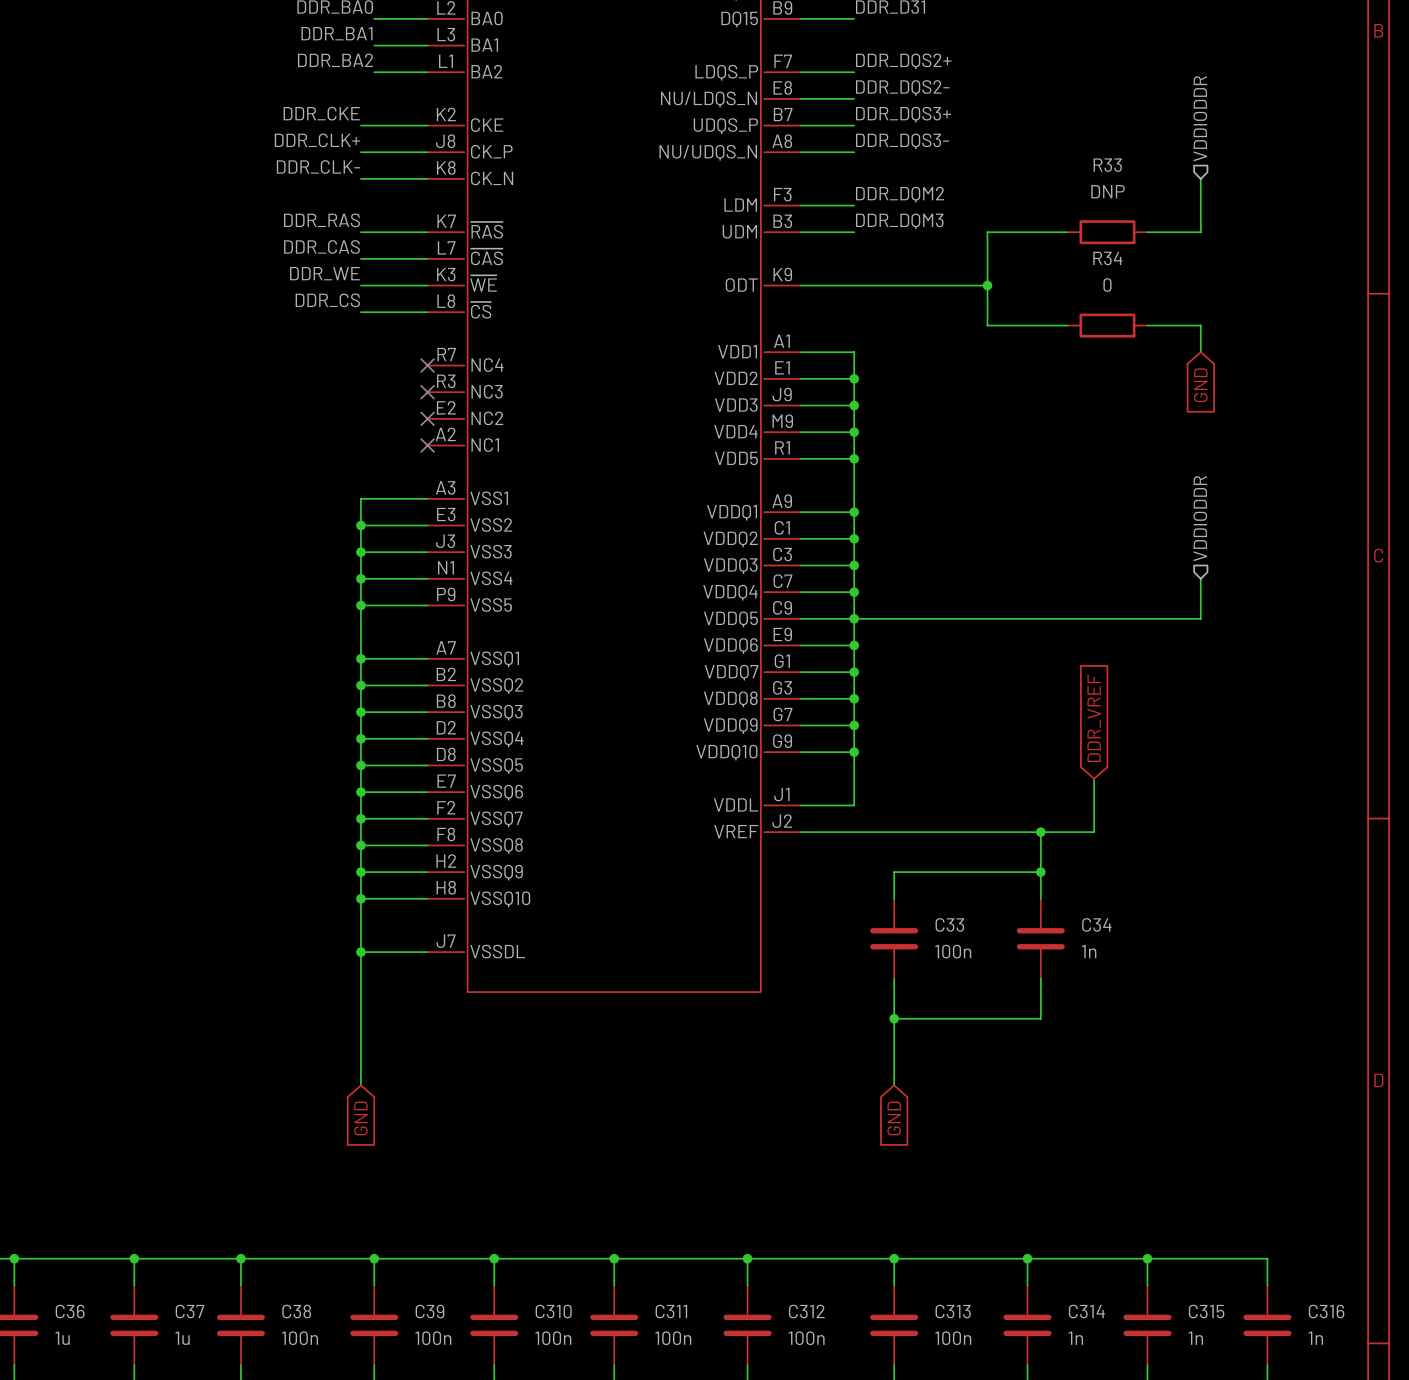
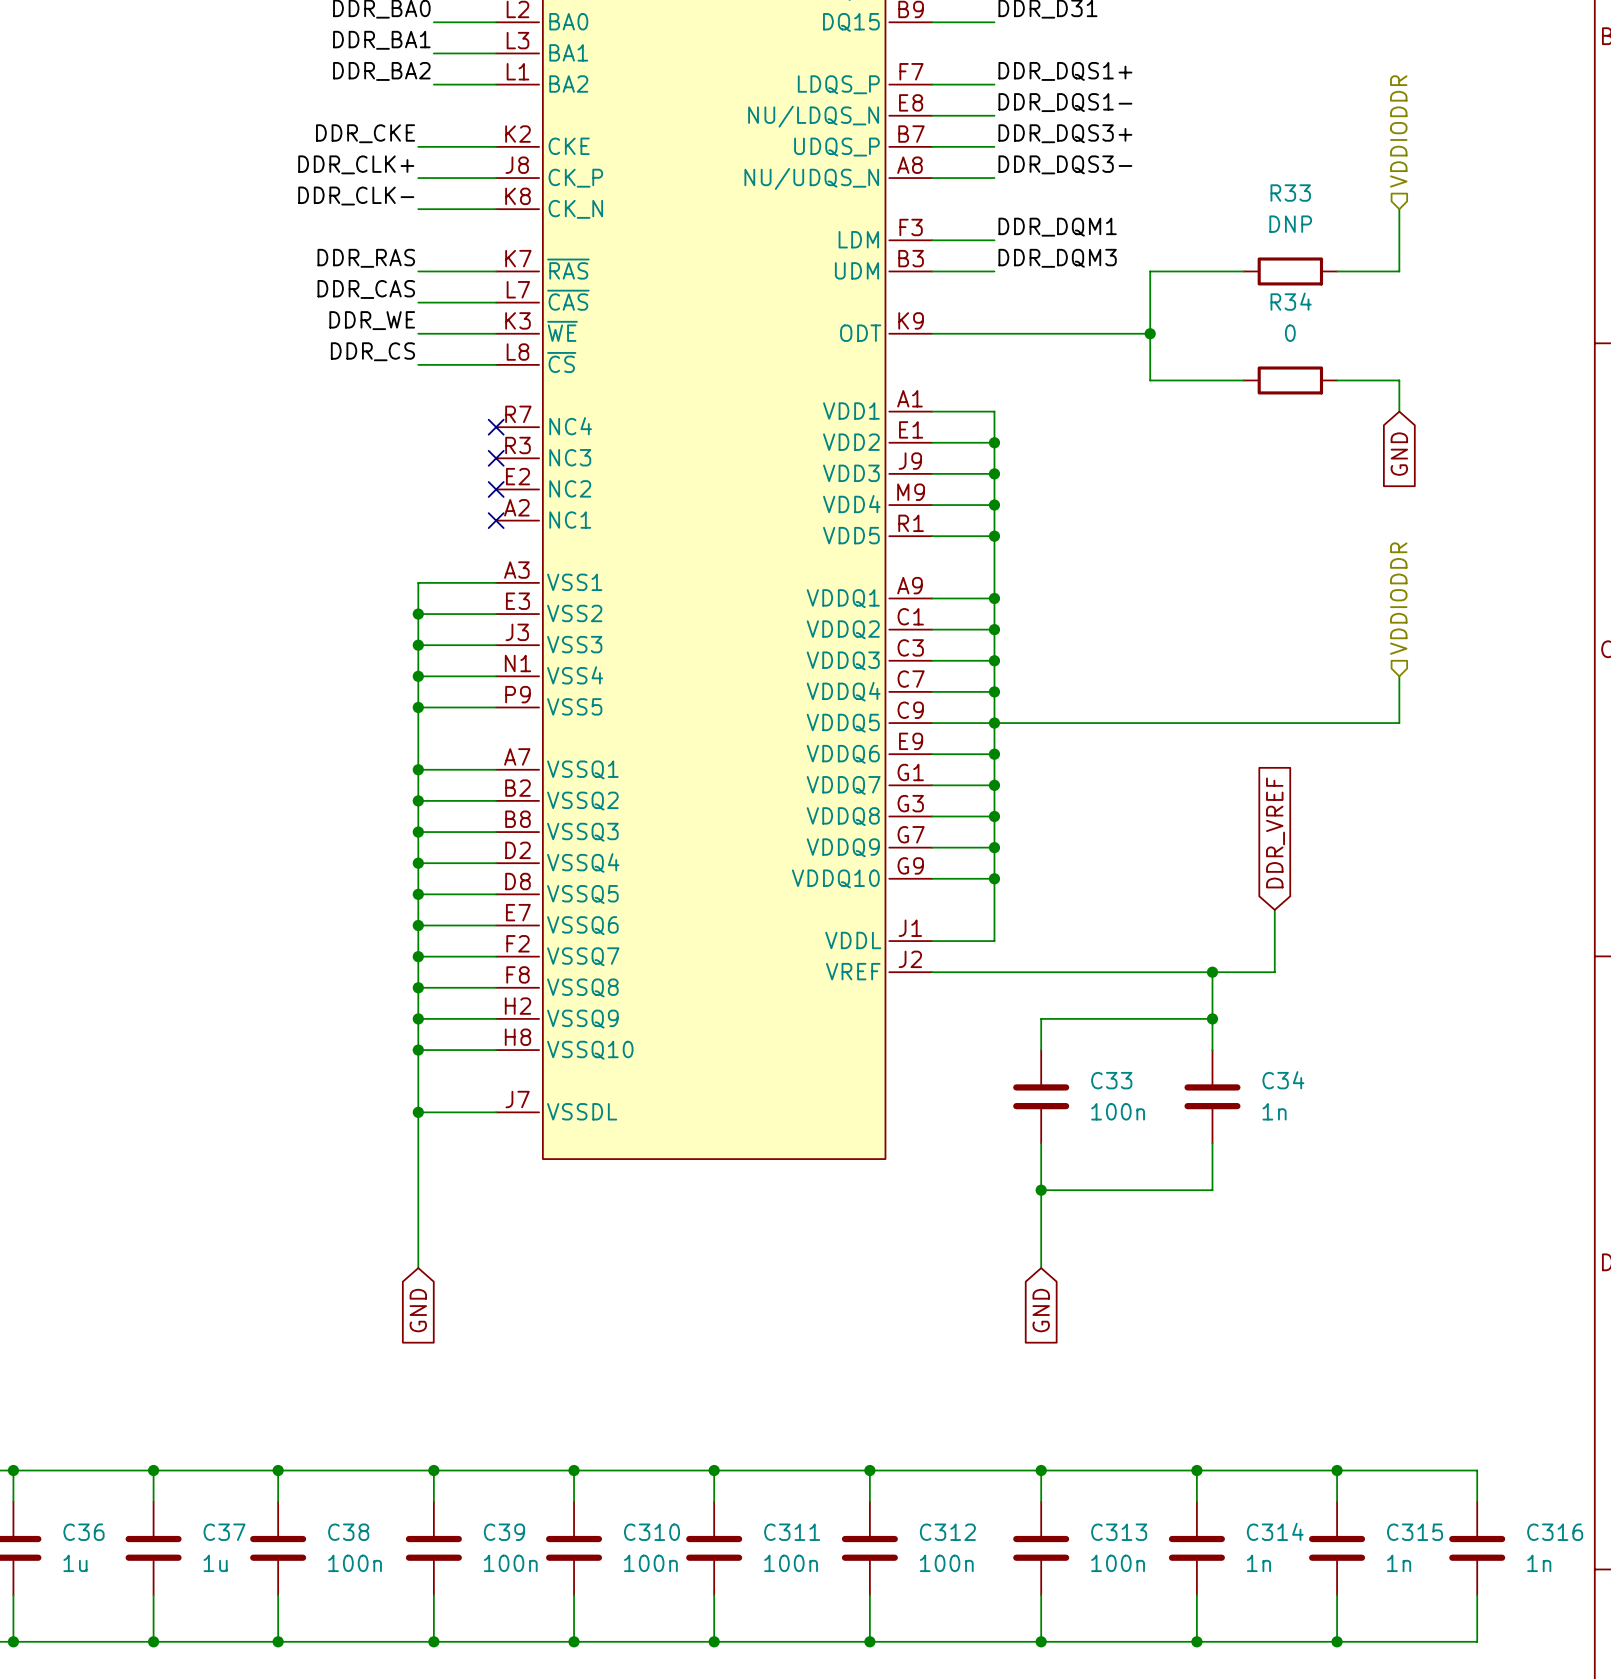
label: DDR_DQS2+ (903, 61) -> DDR_DQS1+ (1065, 71)
label: DDR_DQS2- (902, 88) -> DDR_DQS1- (1065, 102)
label: DDR_DQM2 (900, 194) -> DDR_DQM1 (1057, 227)

